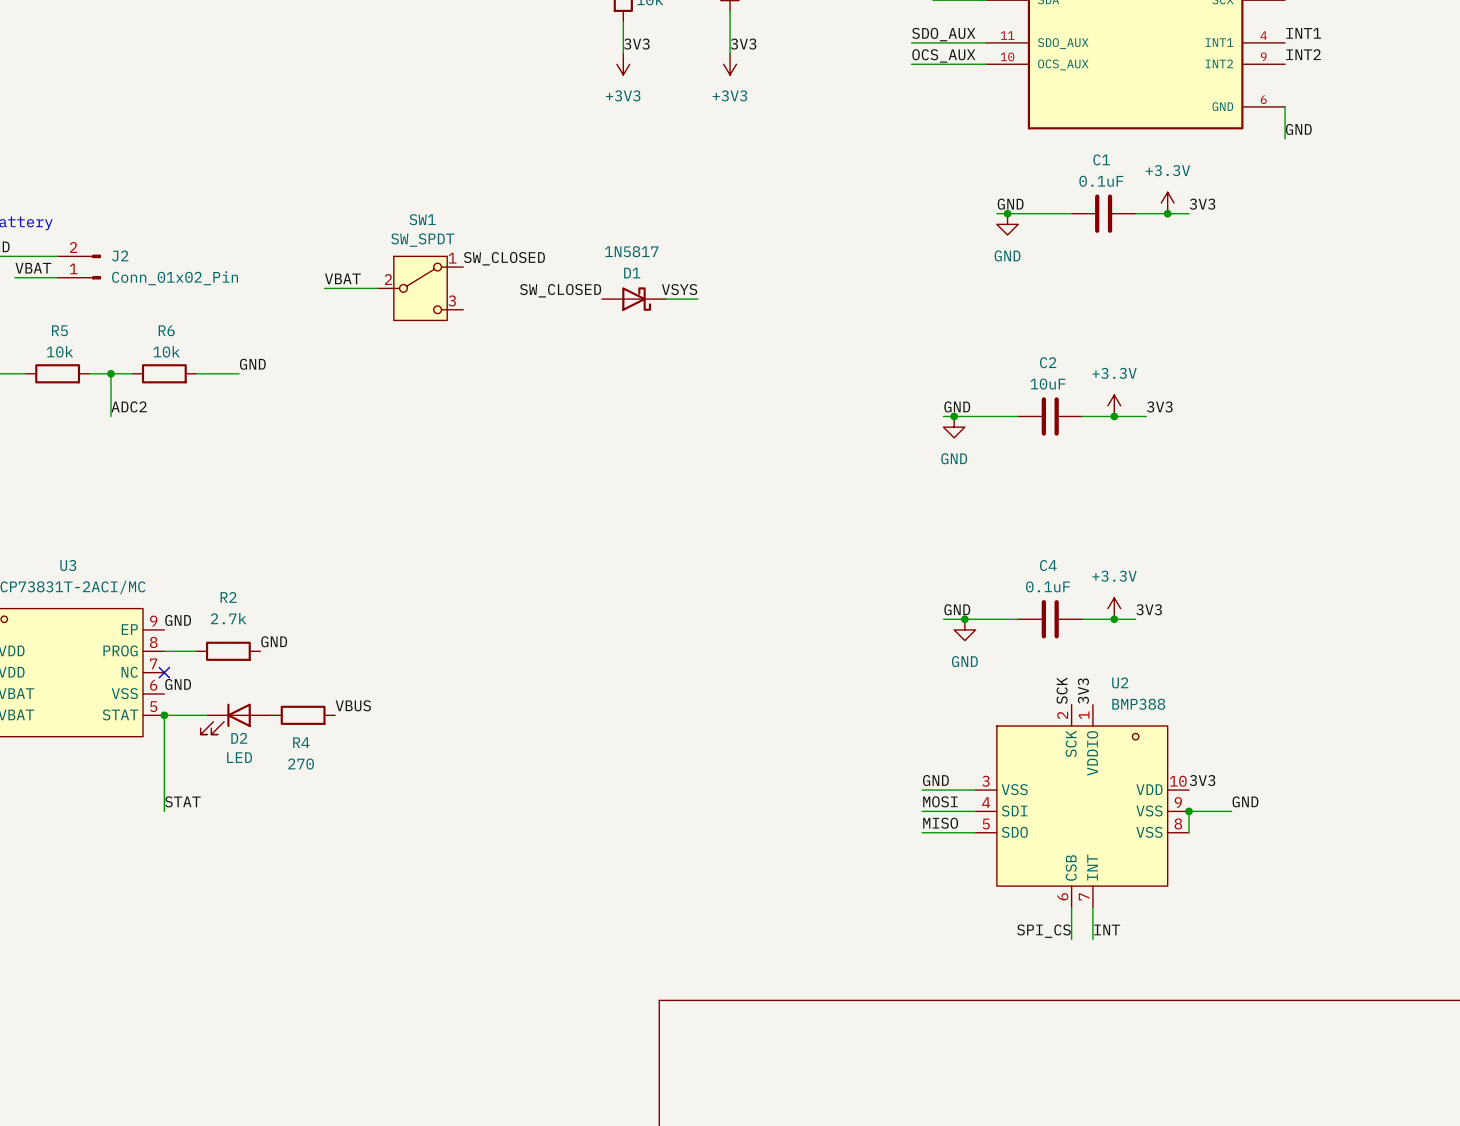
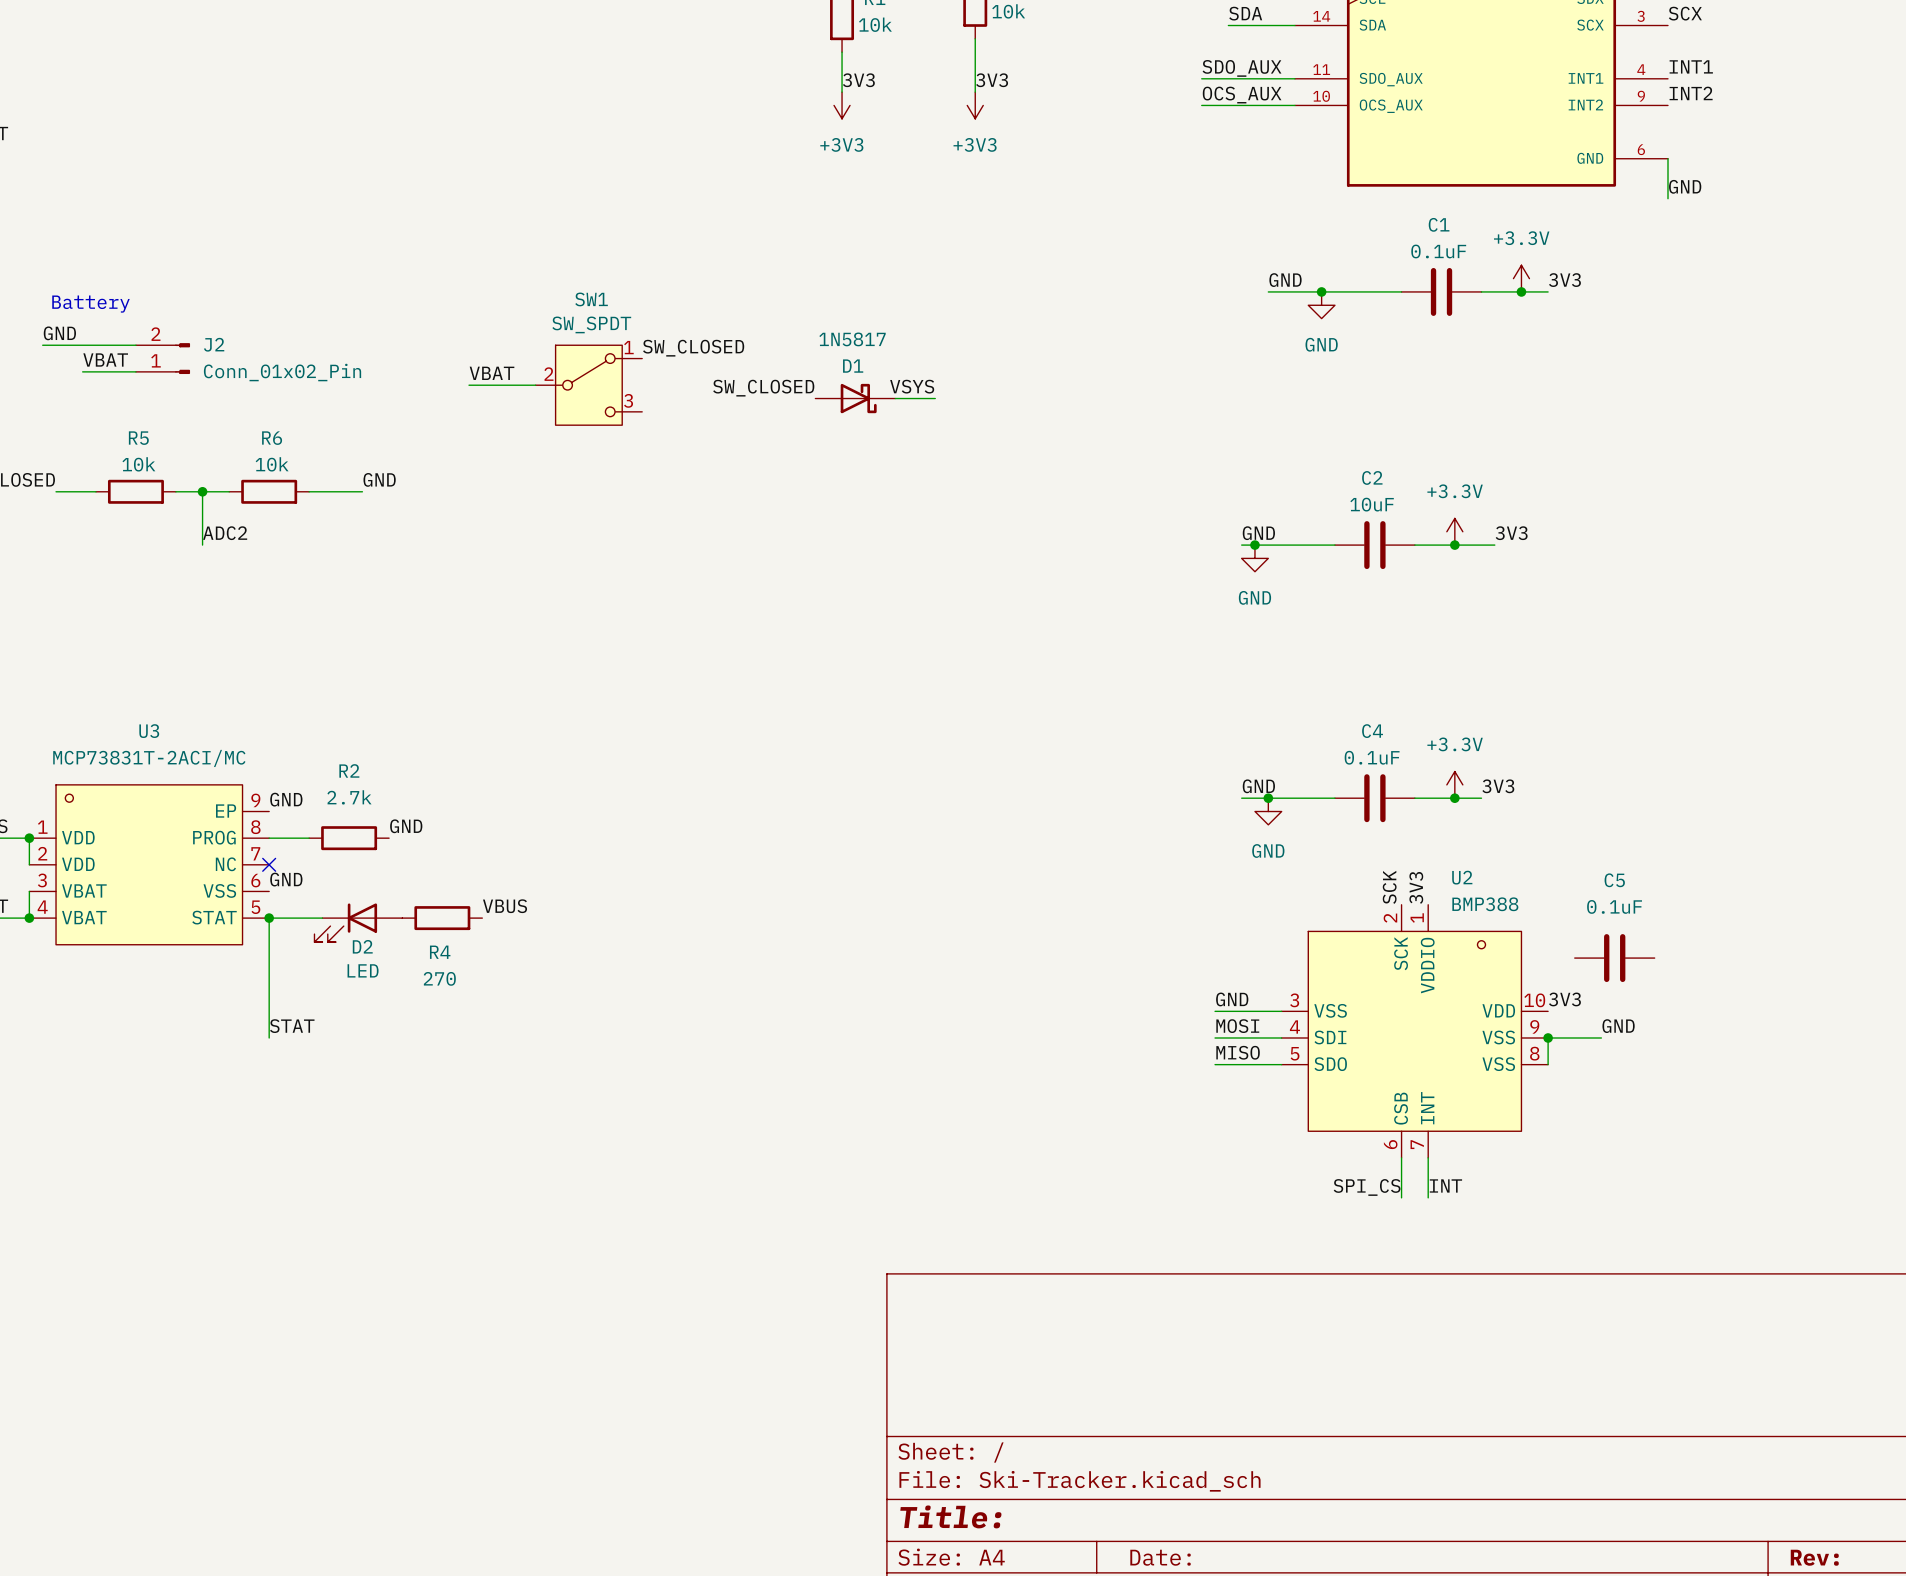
label position: GND (1010, 204) -> GND (1285, 280)
wire: none -> (1268, 291) (1308, 291)
C5: none -> 0.1uF (1614, 958)

